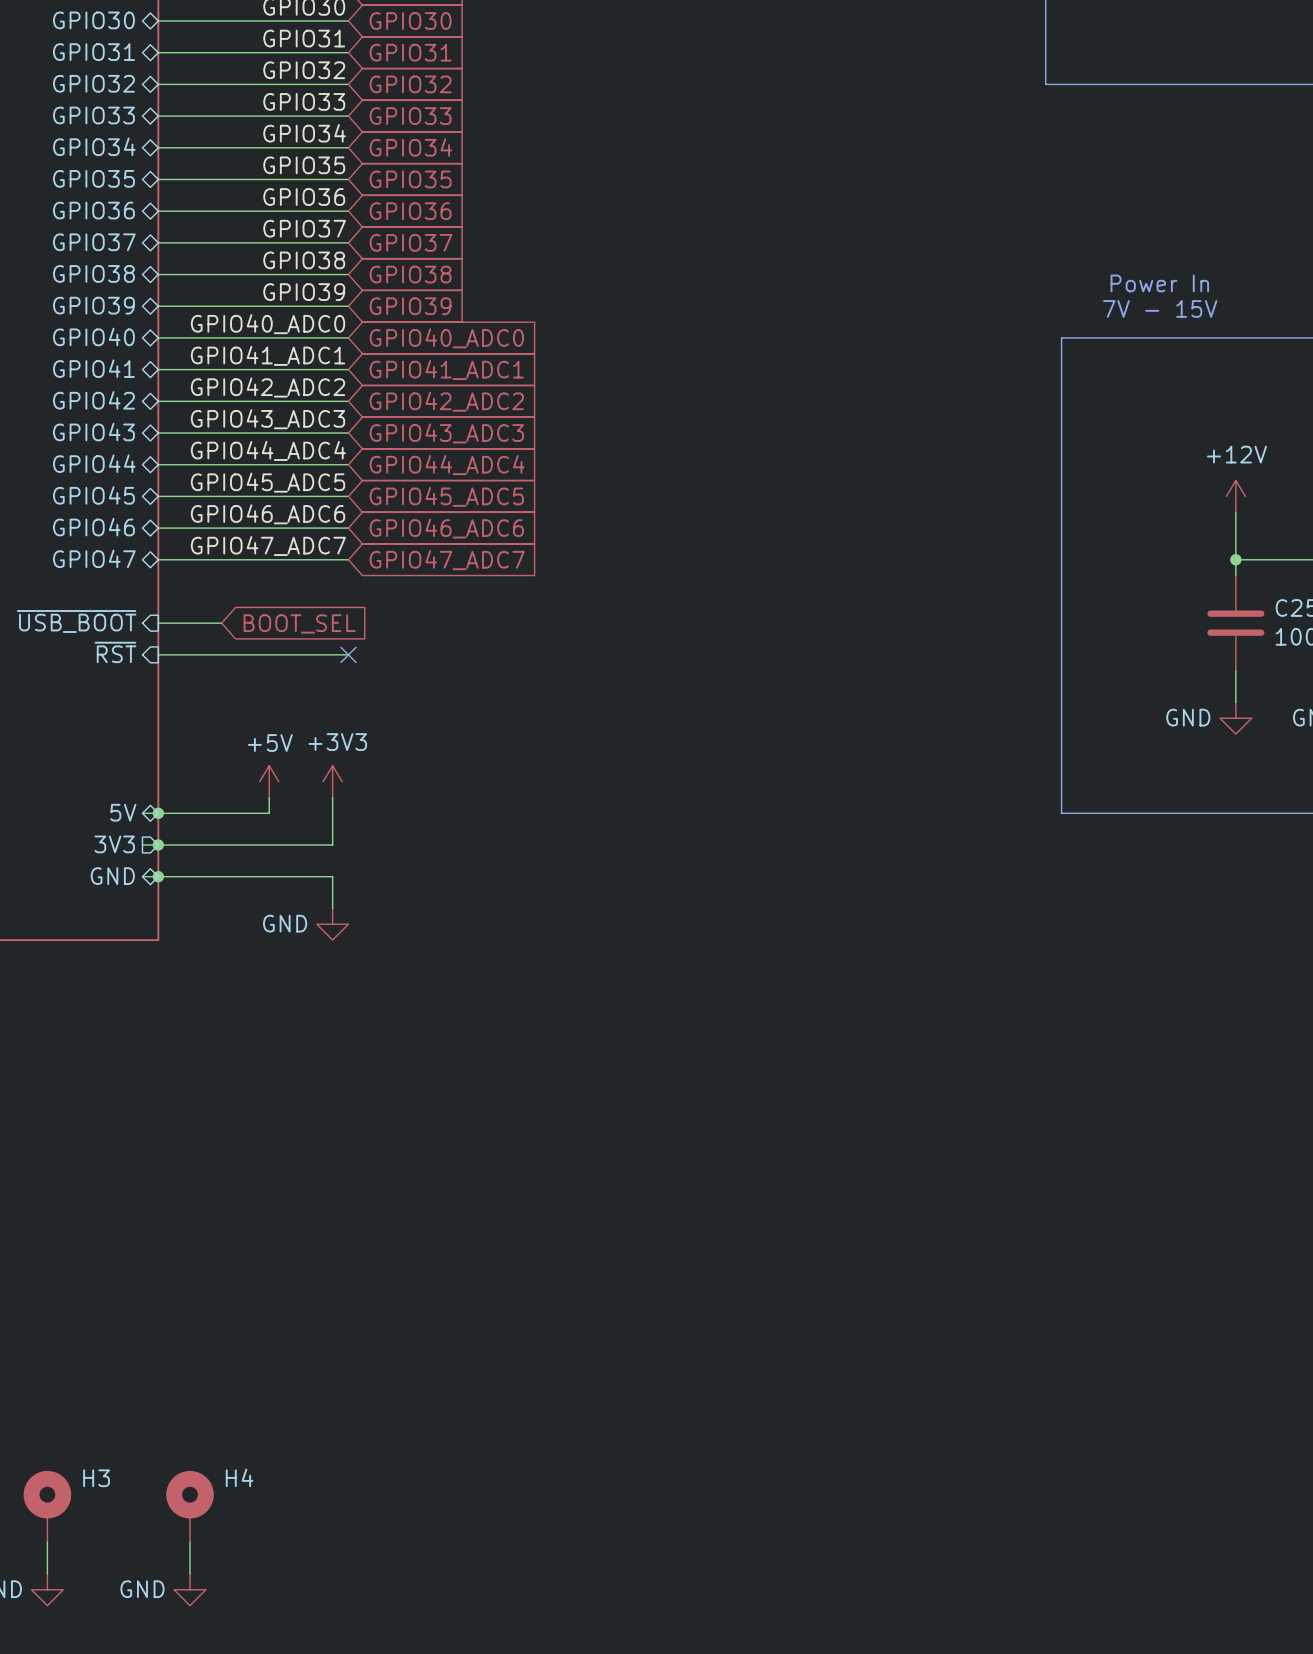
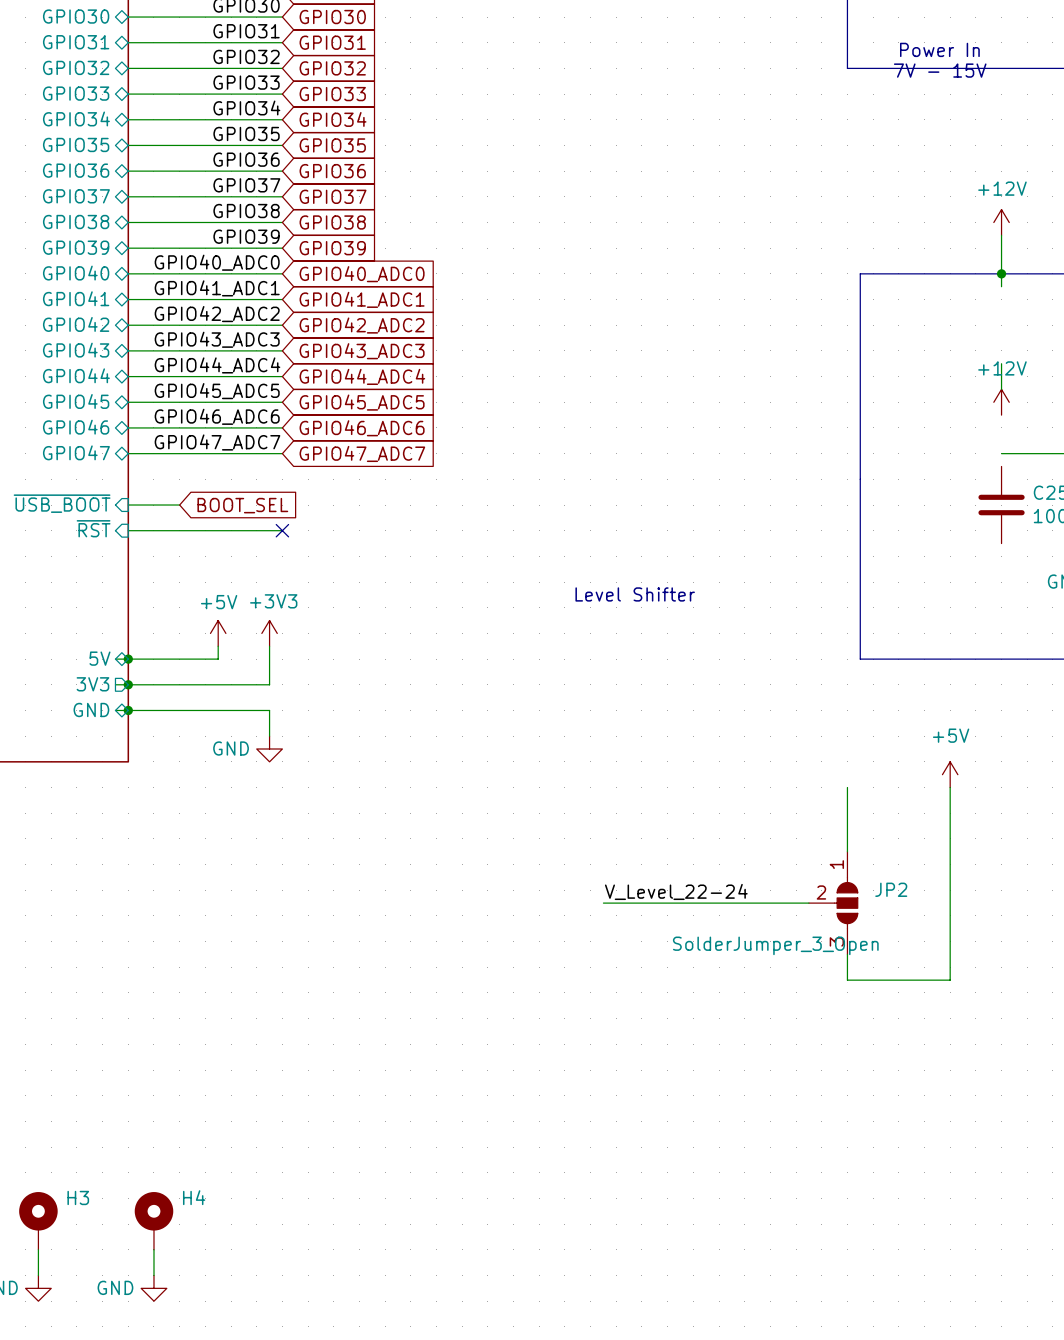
power symbol: none -> +12V (1001, 222)
text position: Power In (1159, 283) -> Power In (939, 49)
text position: 7V - 15V (1160, 308) -> 7V - 15V (940, 70)
junction: none -> (1001, 273)
wire: (1235, 512) (1235, 575) -> (1001, 235) (1001, 286)
junction: (1235, 559) -> none
wire: (1235, 670) (1235, 702) -> (1001, 363) (1001, 389)
power symbol: GND (1235, 718) -> none
text: none -> Level Shifter (635, 594)
power symbol: none -> +5V (950, 774)
wire: none -> (847, 787) (847, 851)
wire: none -> (950, 787) (950, 980) (847, 980) (847, 954)
label: none -> V_Level_22-24 (676, 891)
wire: none -> (603, 903) (808, 903)
JP2: none -> SolderJumper_3_Open (833, 903)

